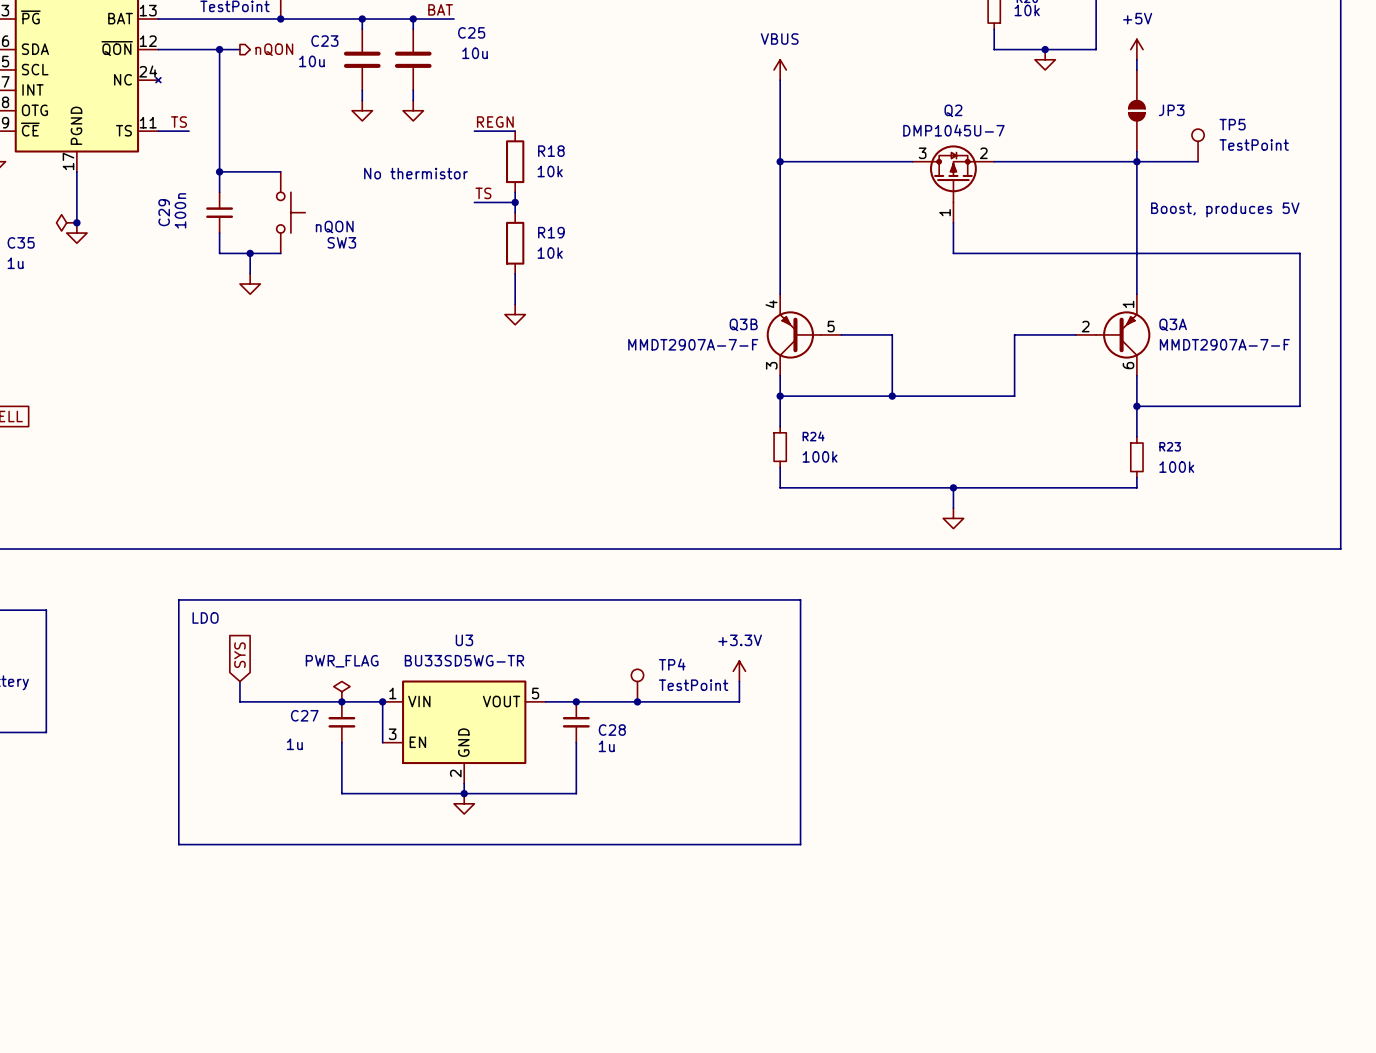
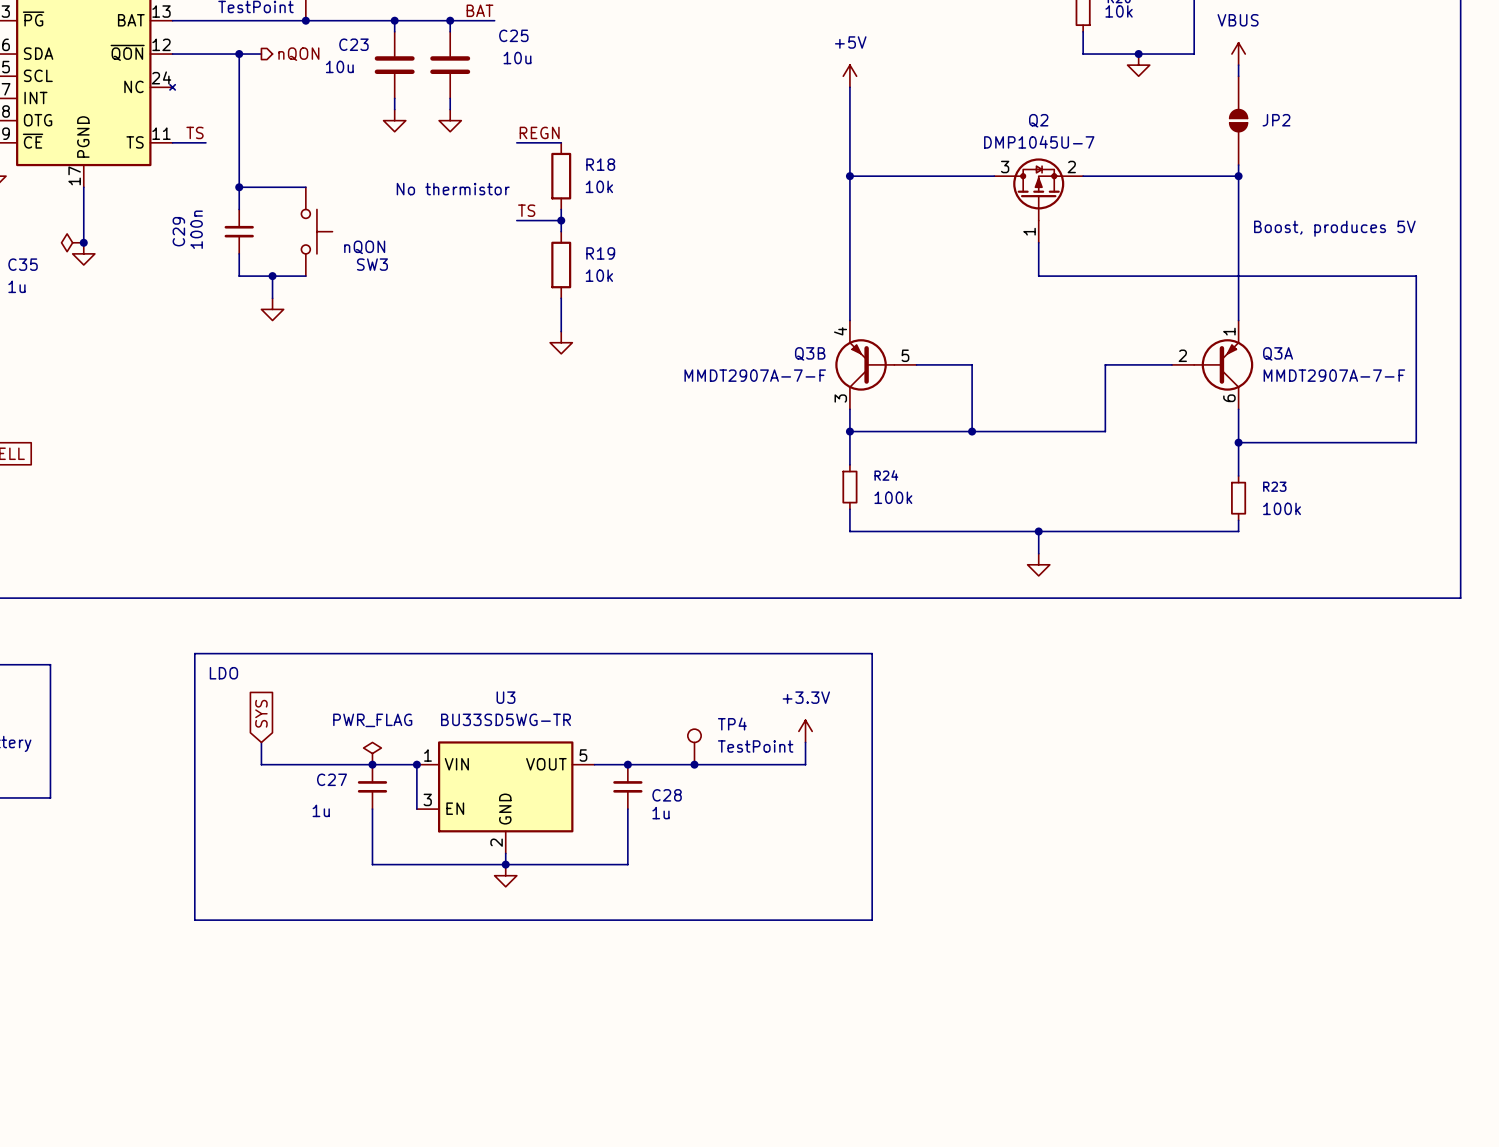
power symbol: +5V (1136, 49) -> VBUS (1238, 54)
power symbol: VBUS (780, 69) -> +5V (849, 76)
JP3 name: JP3 (1171, 110) -> JP2 (1276, 120)
TP5: TestPoint (1198, 145) -> none
wire: (1136, 161) (1198, 161) -> none

